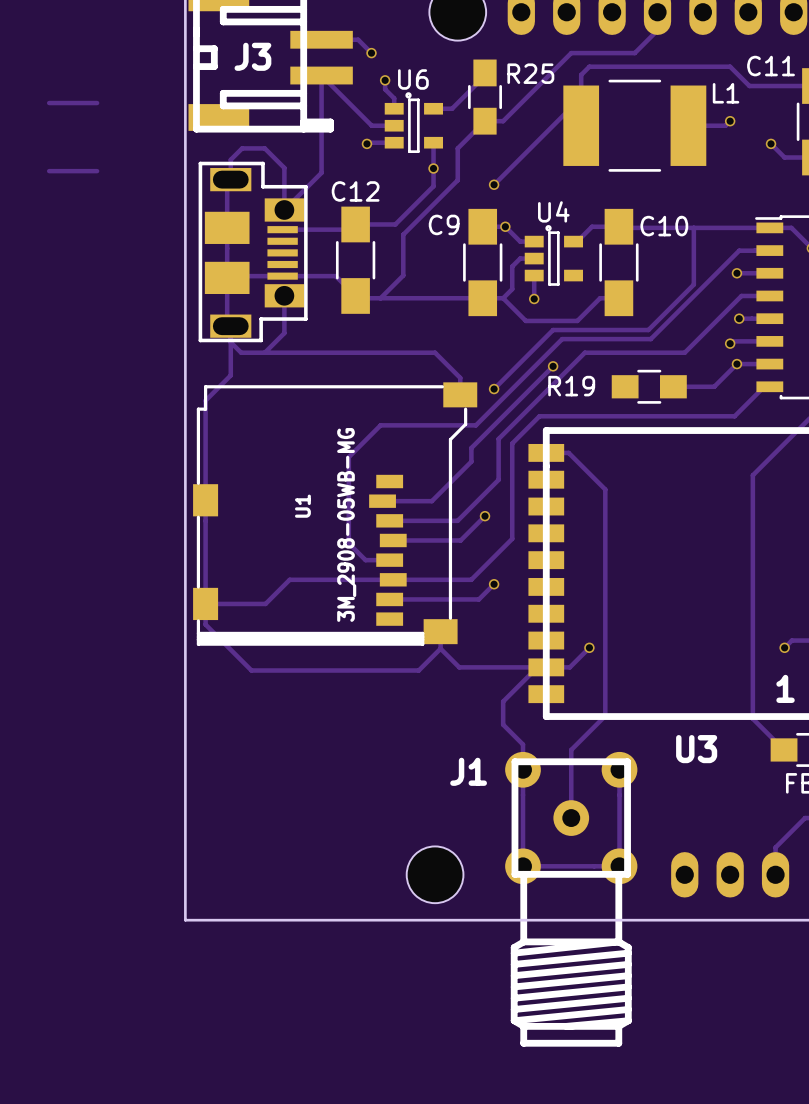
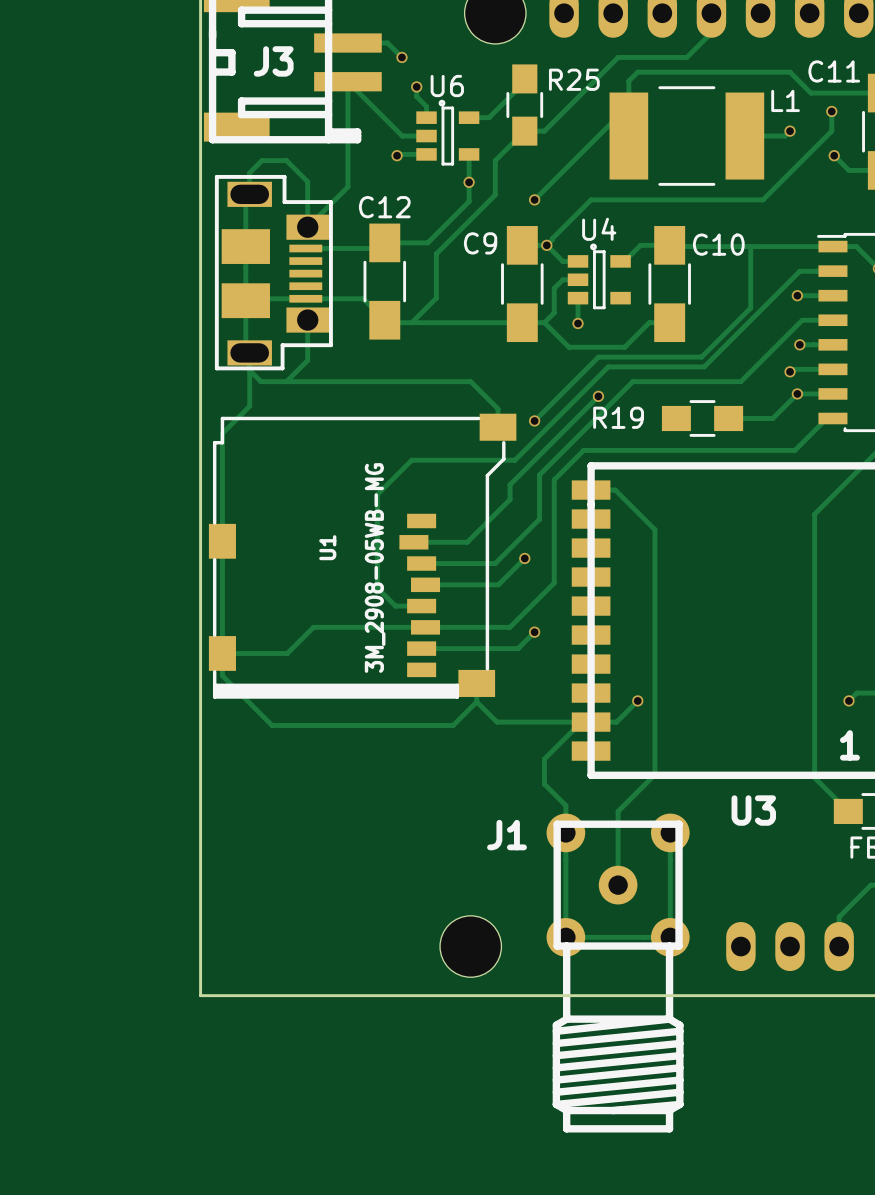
track: (49, 103) (97, 103) -> none
track: none -> (831, 111) (831, 131) (763, 199) (591, 199) (546, 245)
via: none -> (831, 111)
track: (49, 171) (97, 171) -> none

